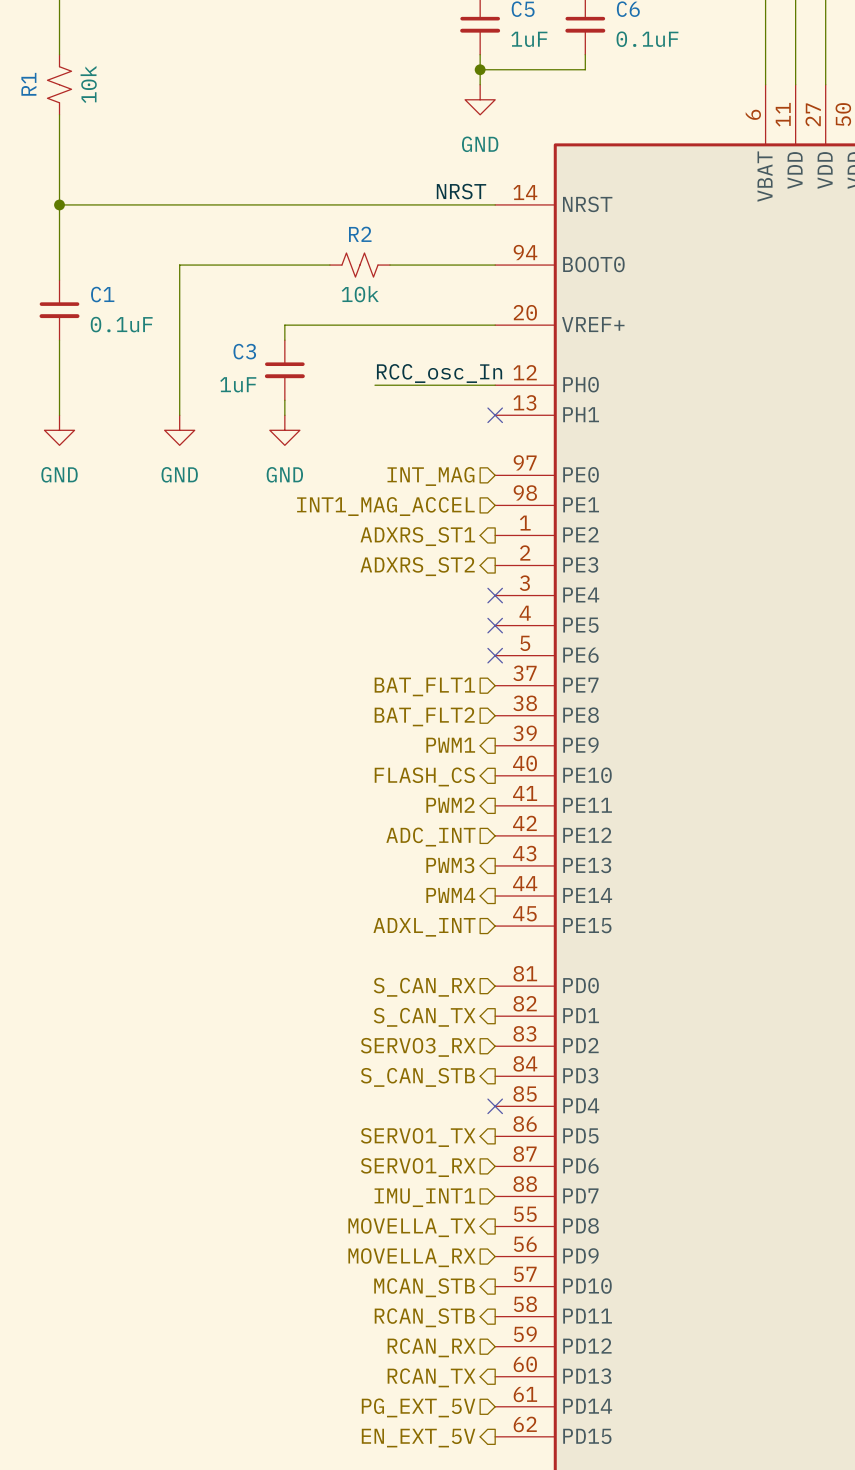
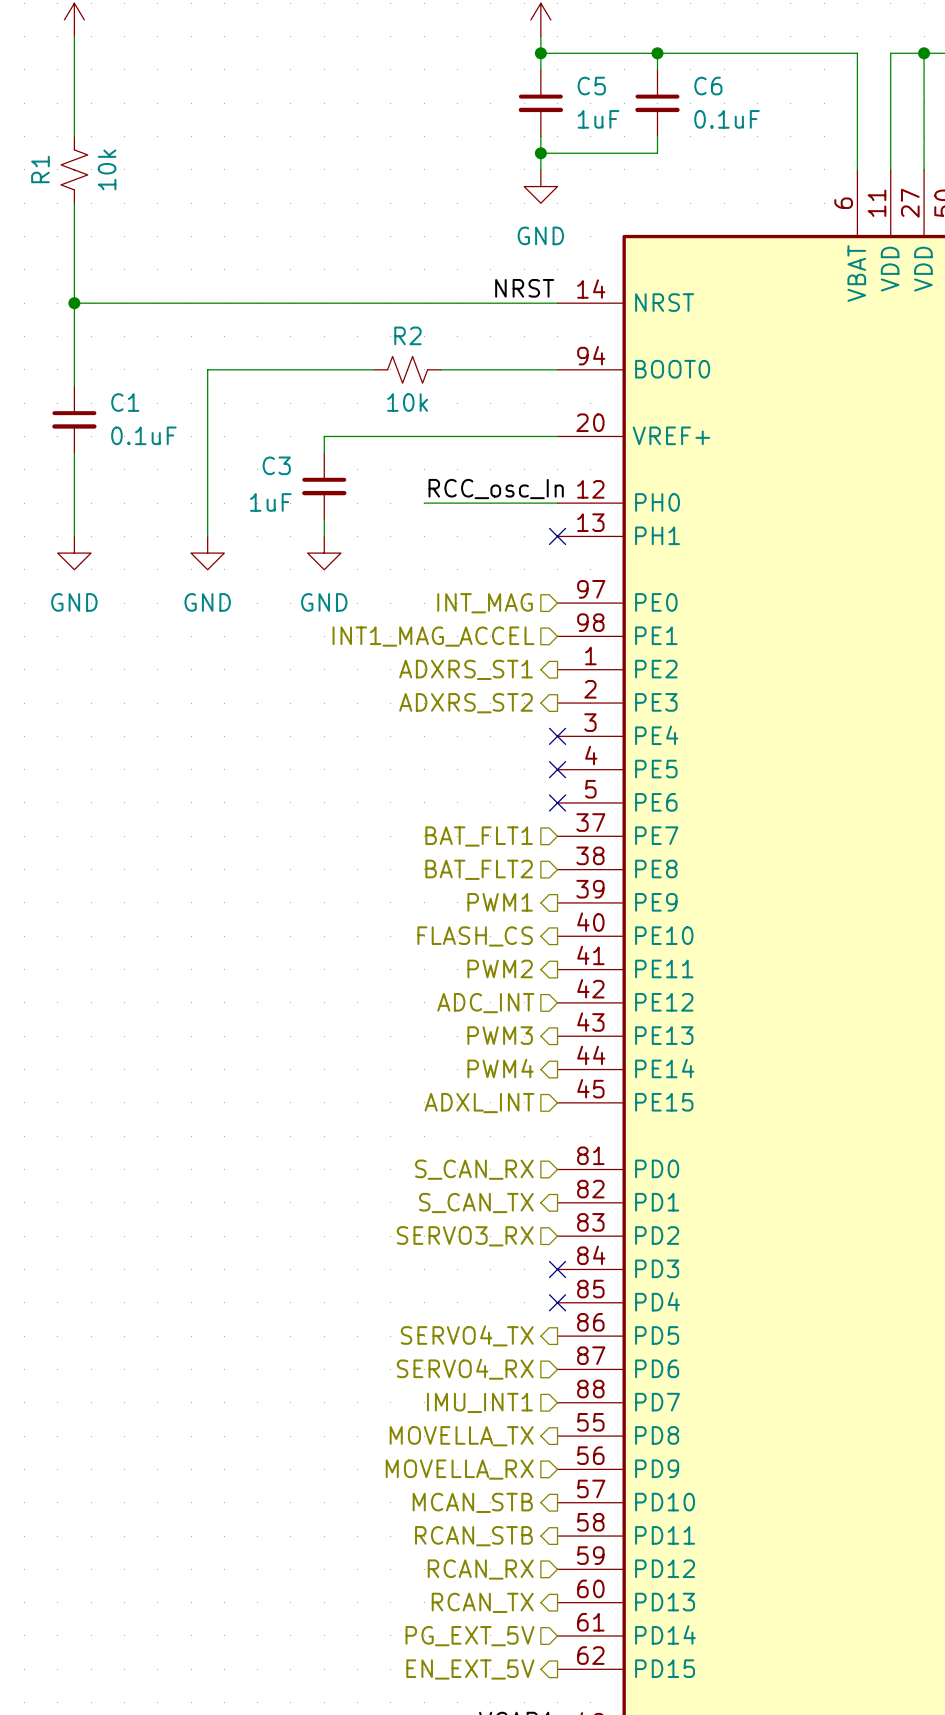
no-connect mark: none -> (557, 1269)
hierarchical label: S_CAN_STB (417, 1077) -> none
hierarchical label: SERVO1_TX (418, 1137) -> SERVO4_TX (467, 1335)
hierarchical label: SERVO1_RX (418, 1167) -> SERVO4_RX (465, 1369)

